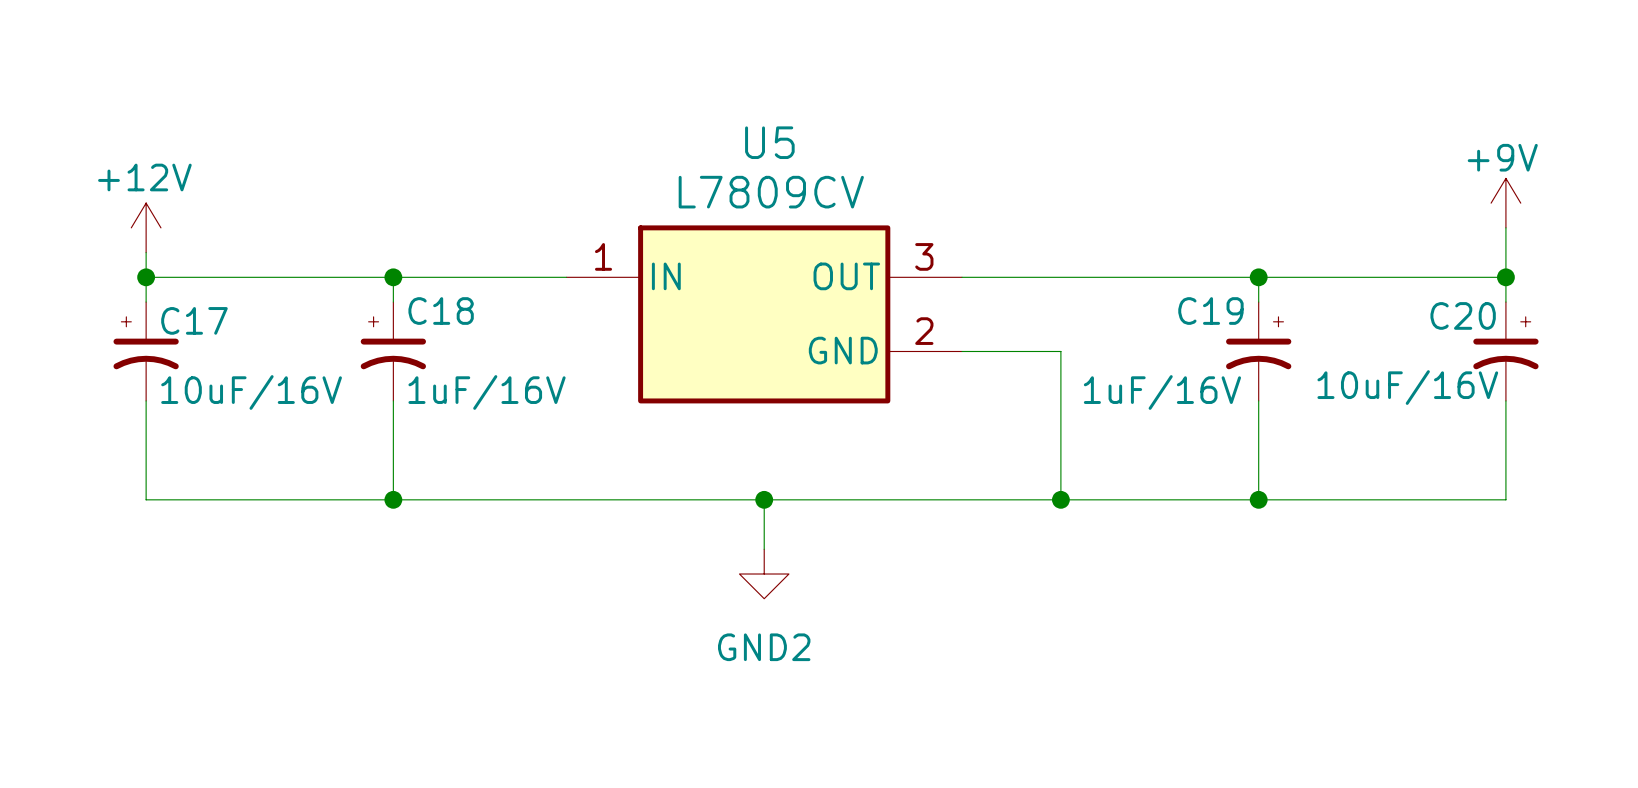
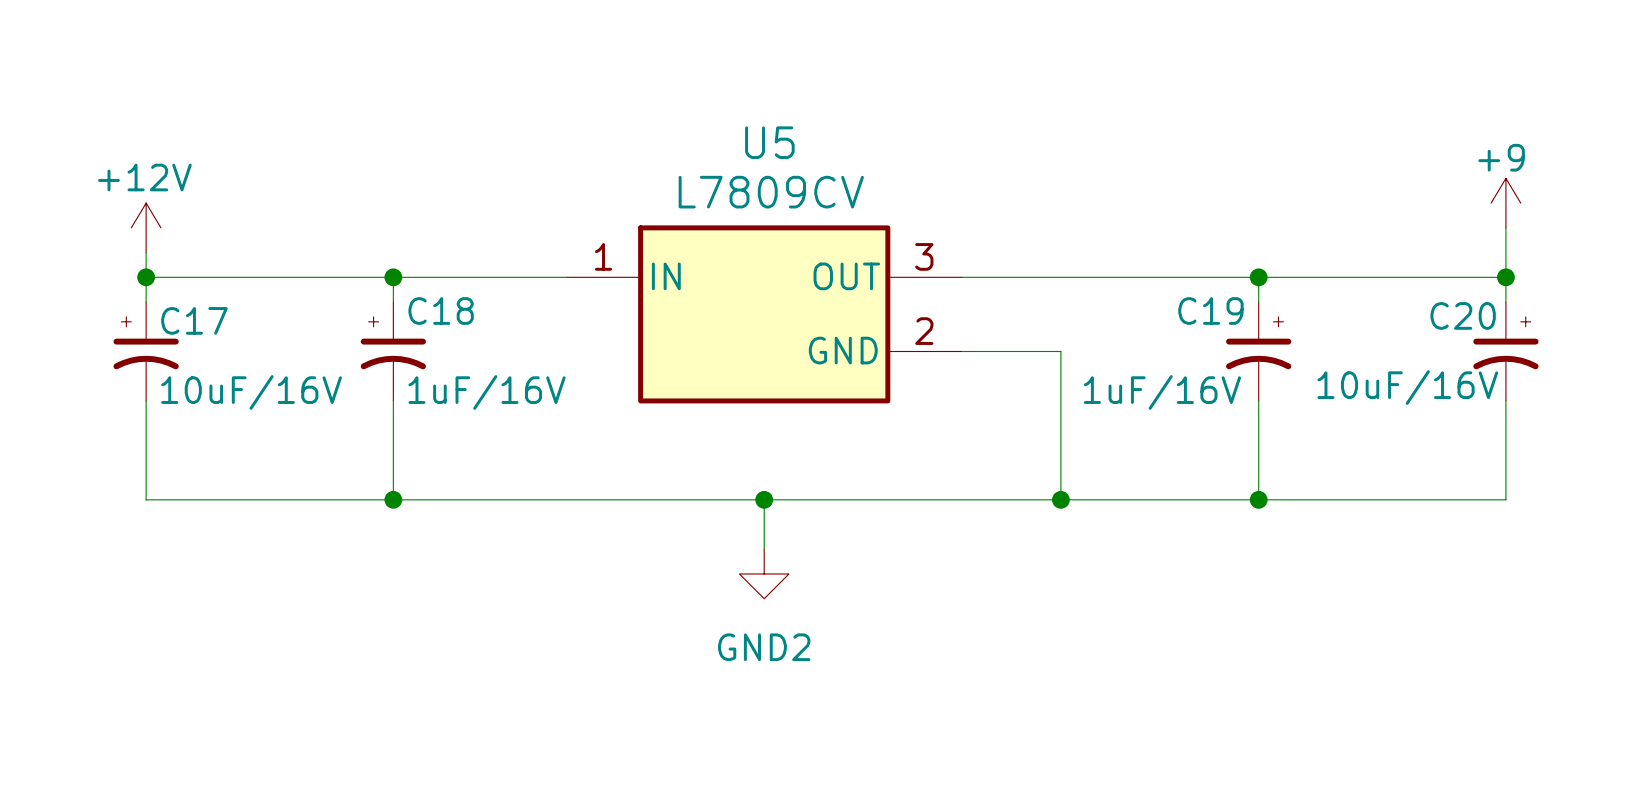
power symbol: +9V (1505, 203) -> +9 (1505, 203)

